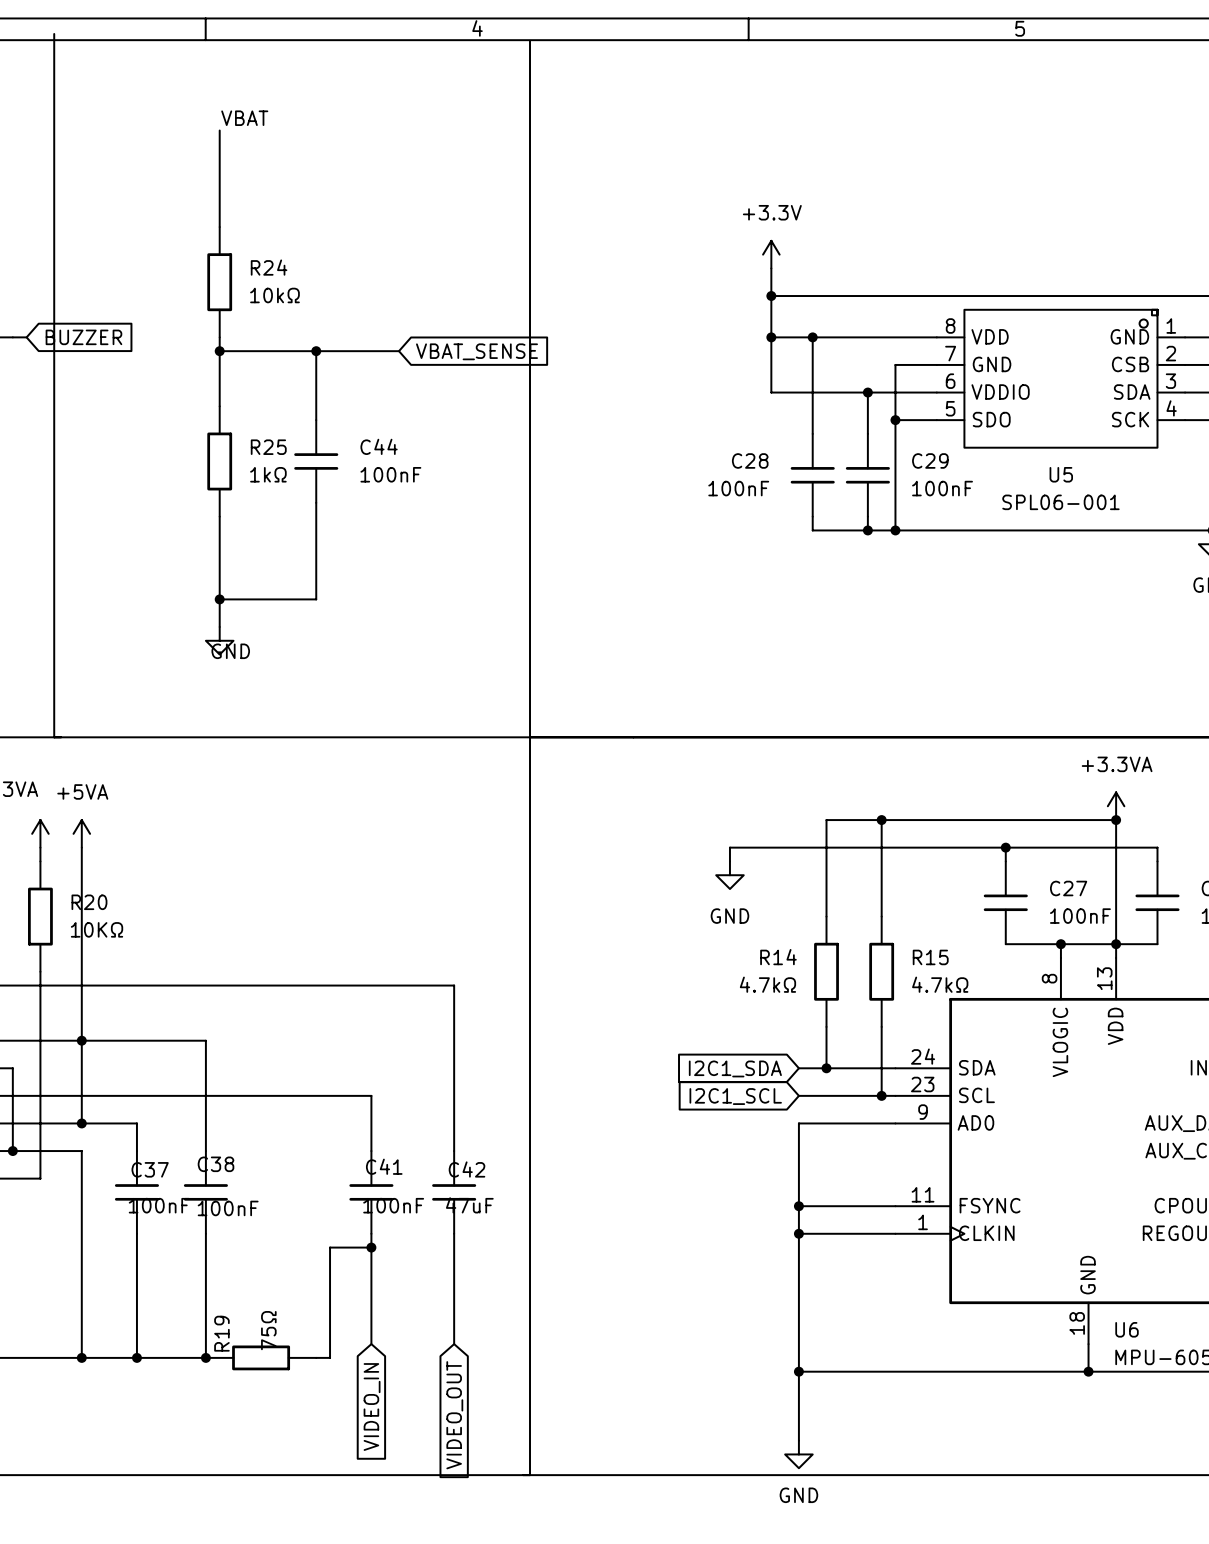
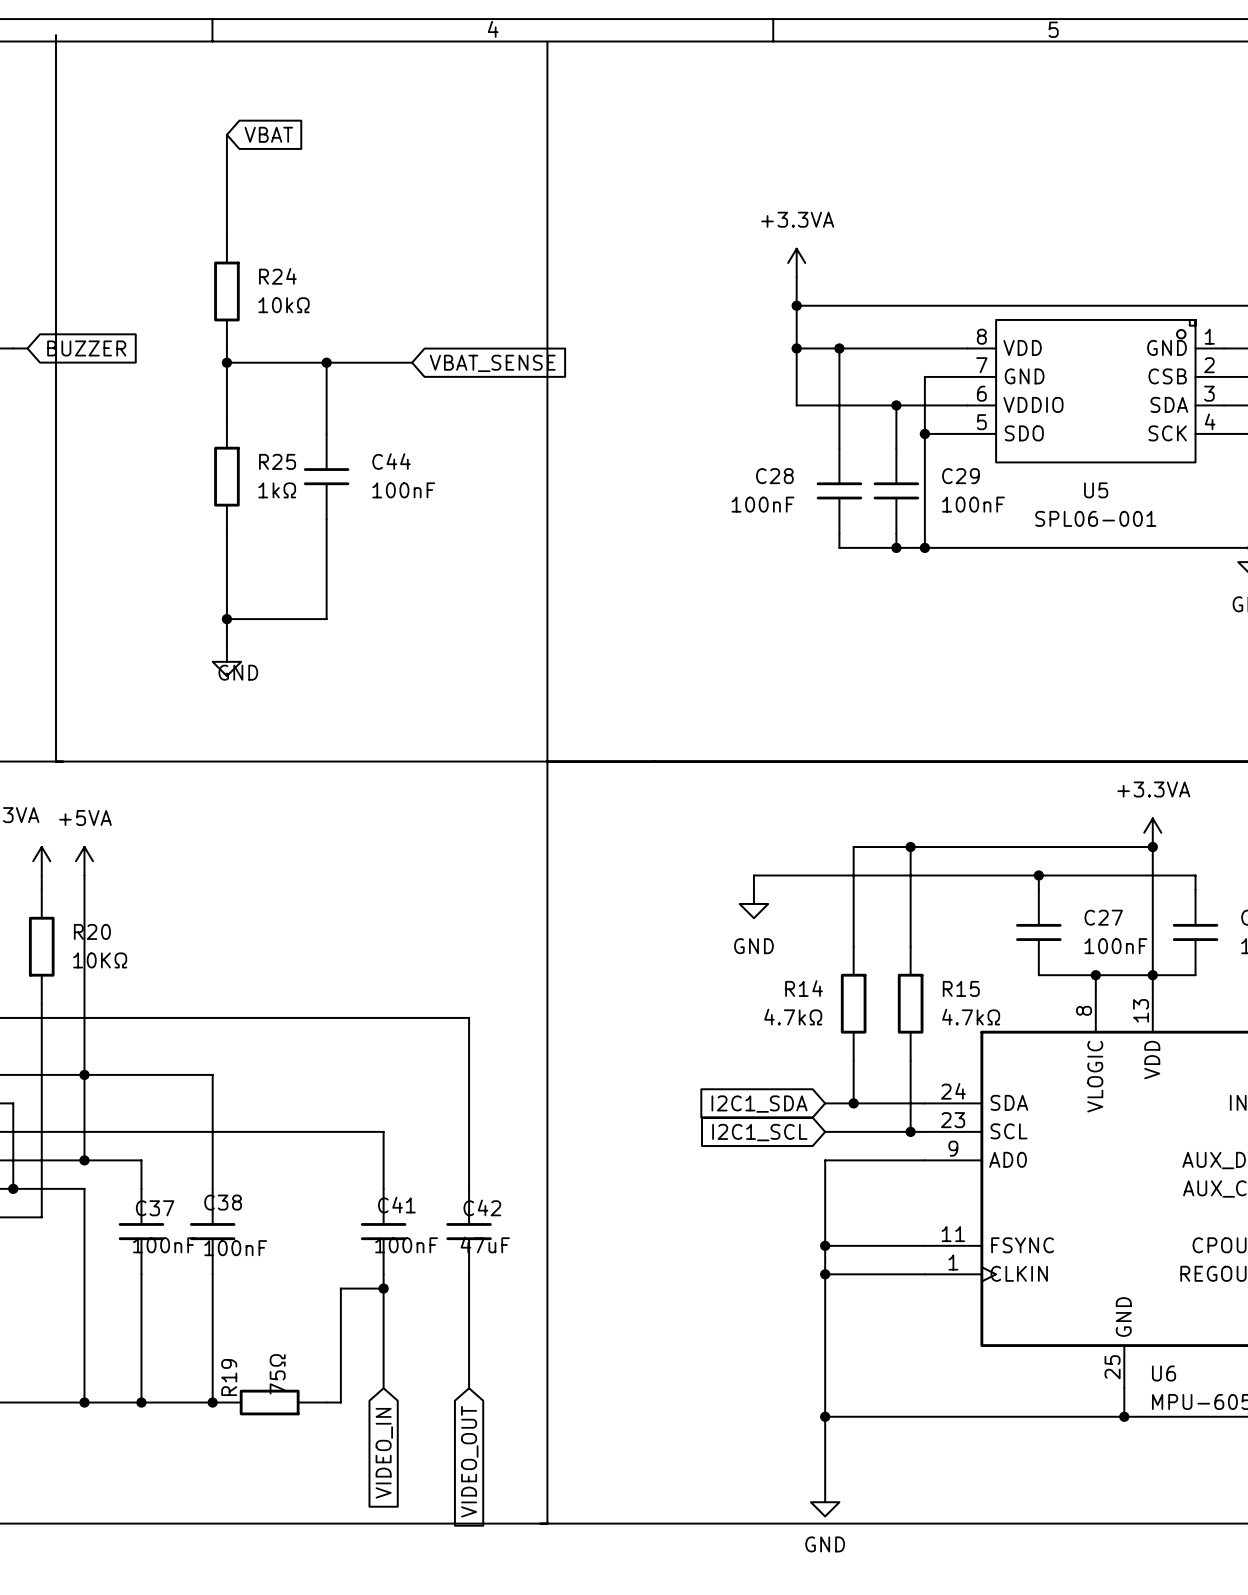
label: VBAT (244, 118) -> none
global label: none -> VBAT (268, 134)
power symbol: +3.3V (771, 254) -> +3.3VA (796, 263)
U6 pin number: 18 (1077, 1323) -> 25 (1112, 1367)

